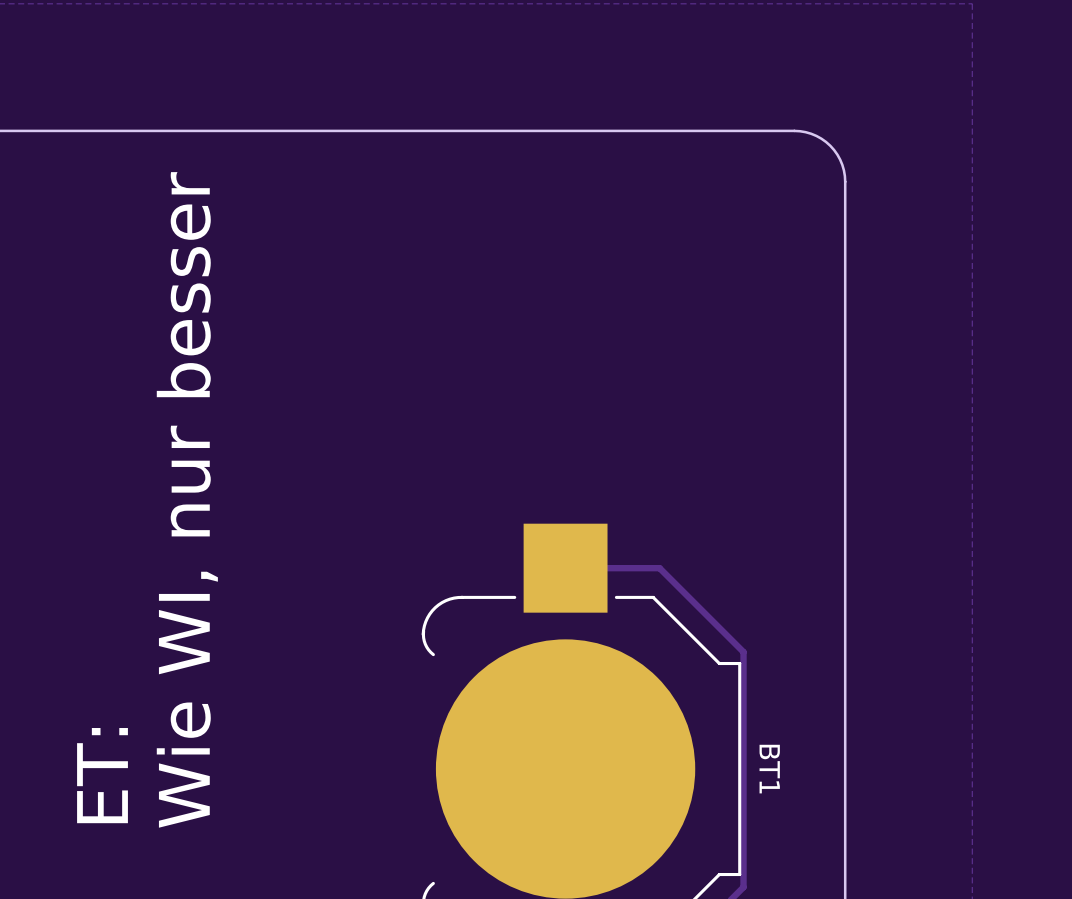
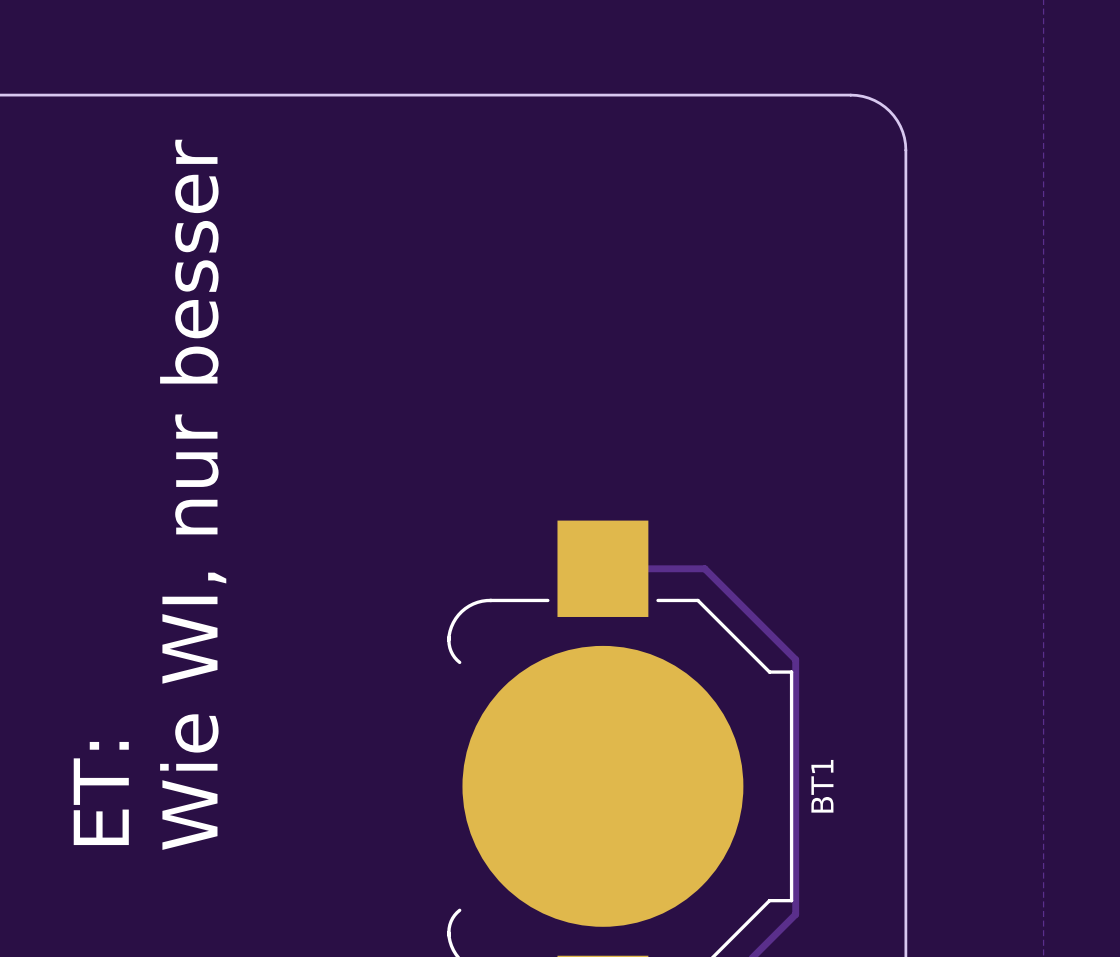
BT1 name rotation: 0° (769, 769) -> 180° (822, 786)

